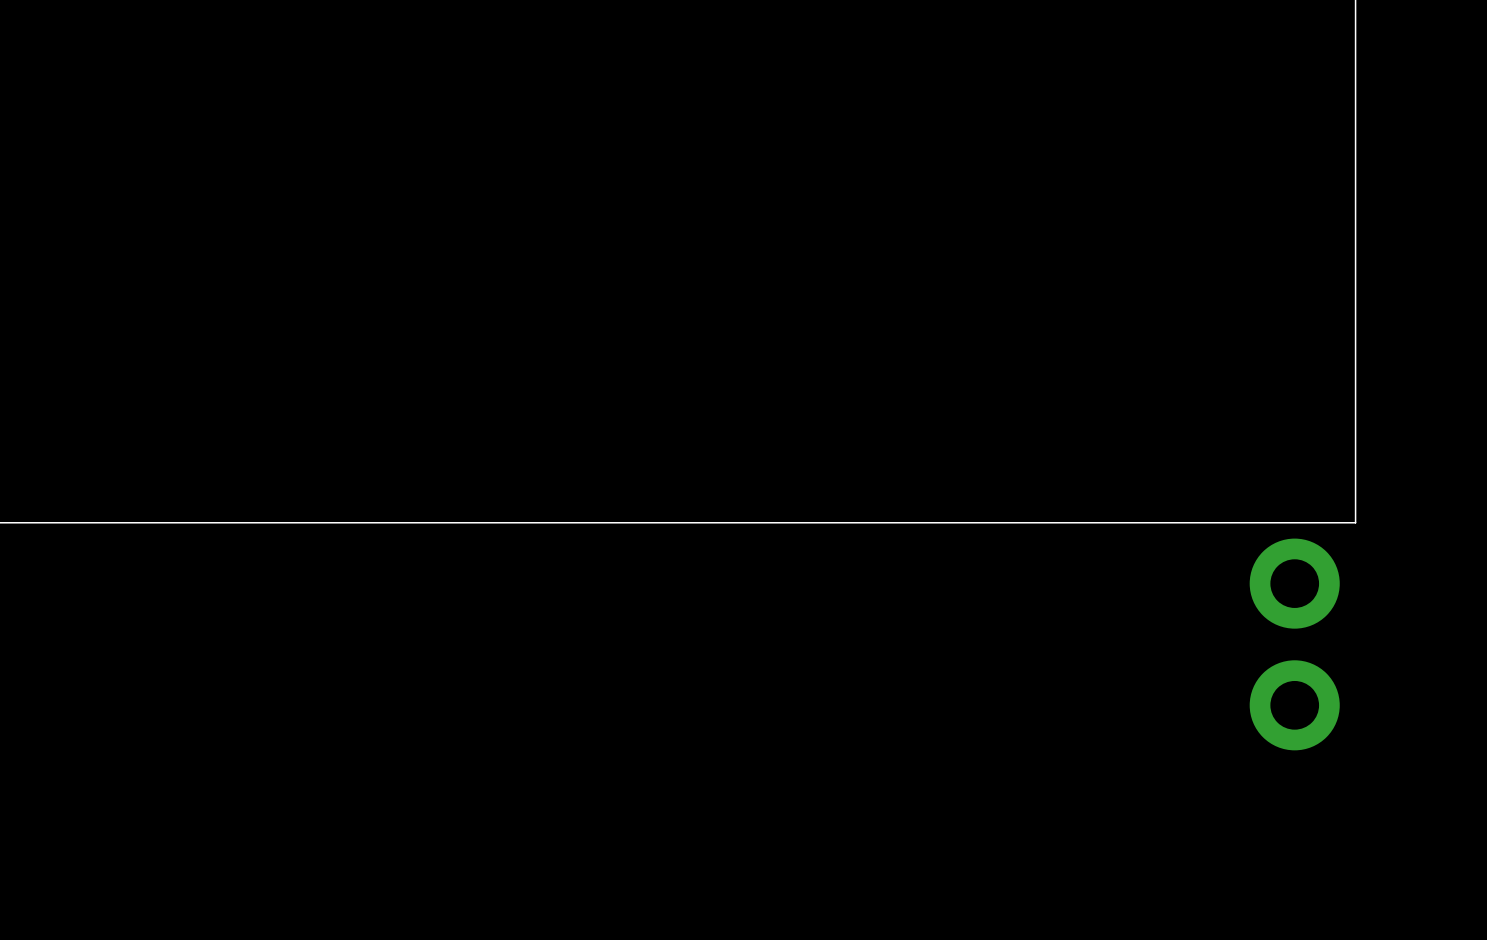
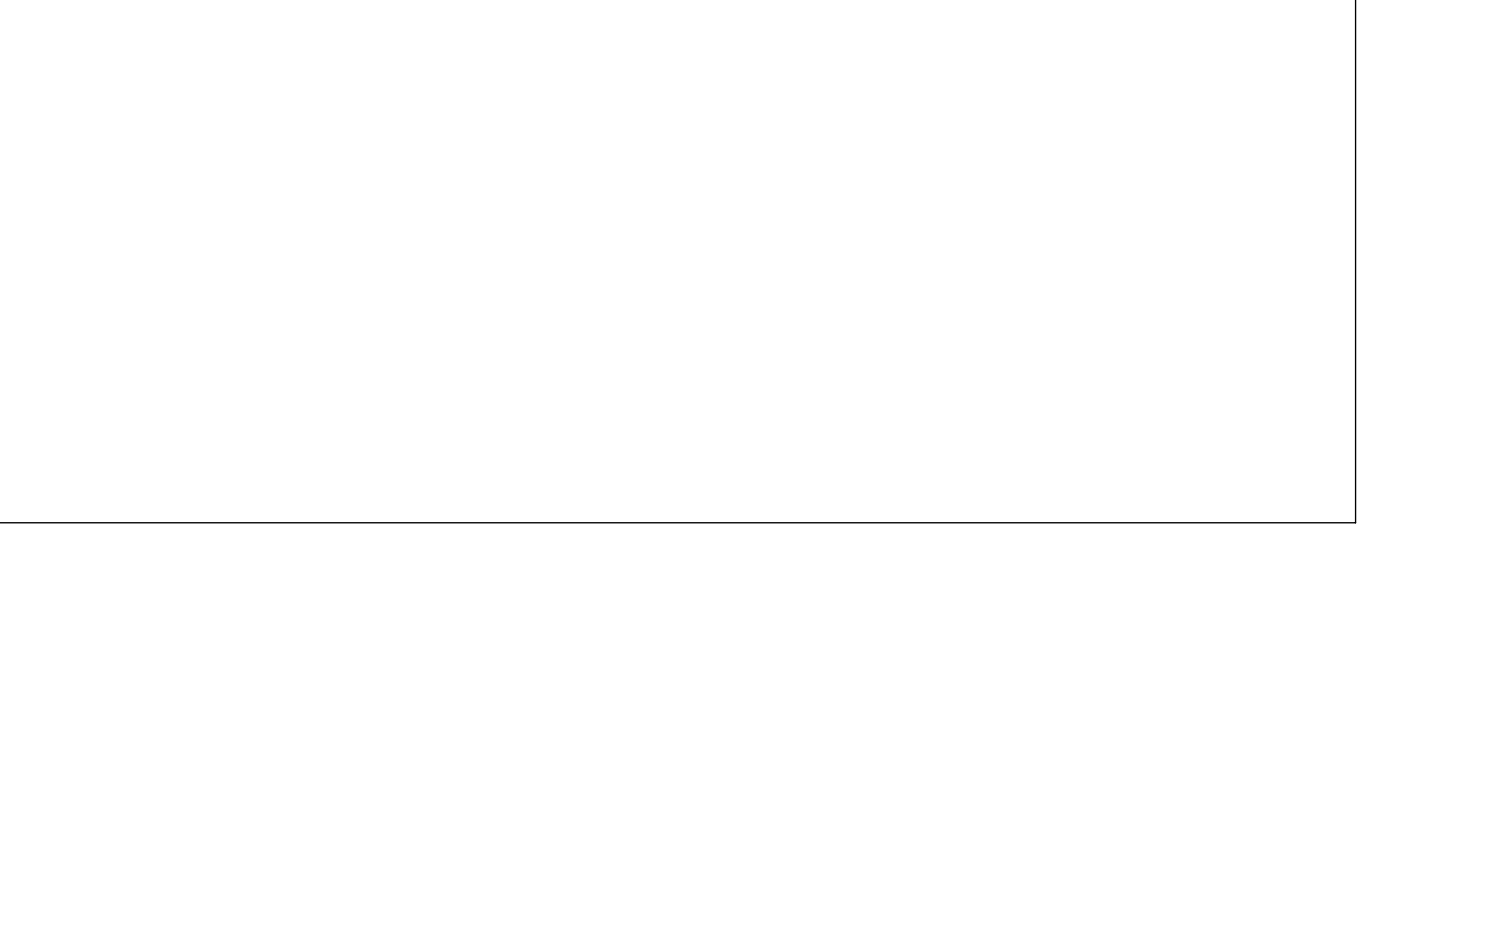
part: (1294, 583) -> none
part: (1294, 705) -> none

